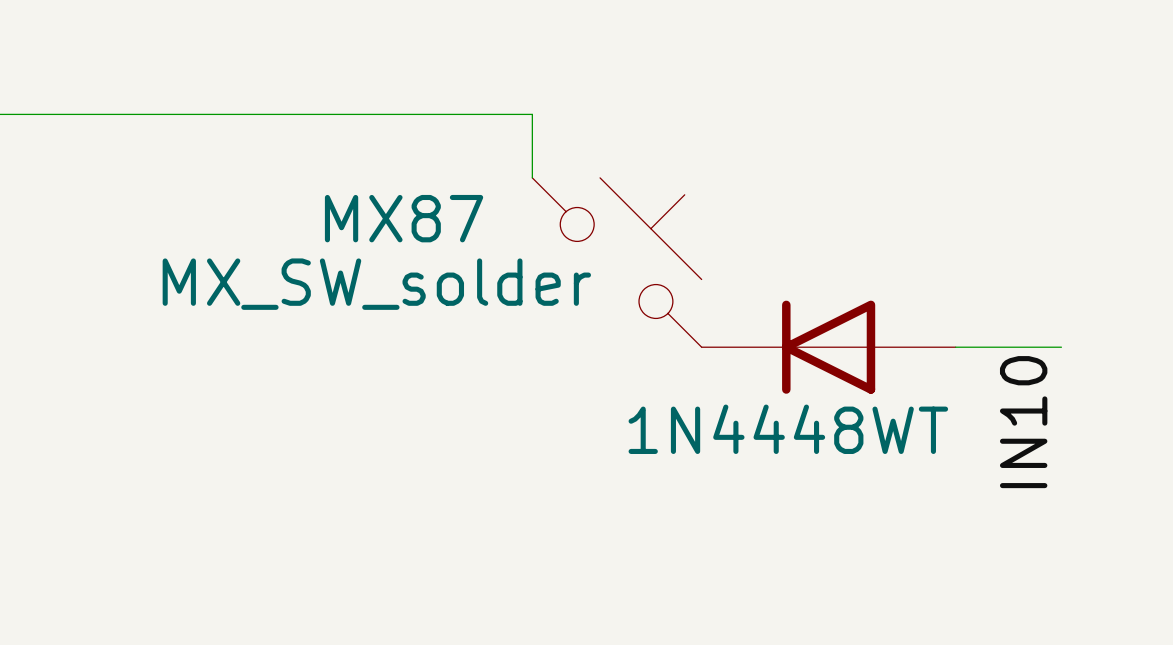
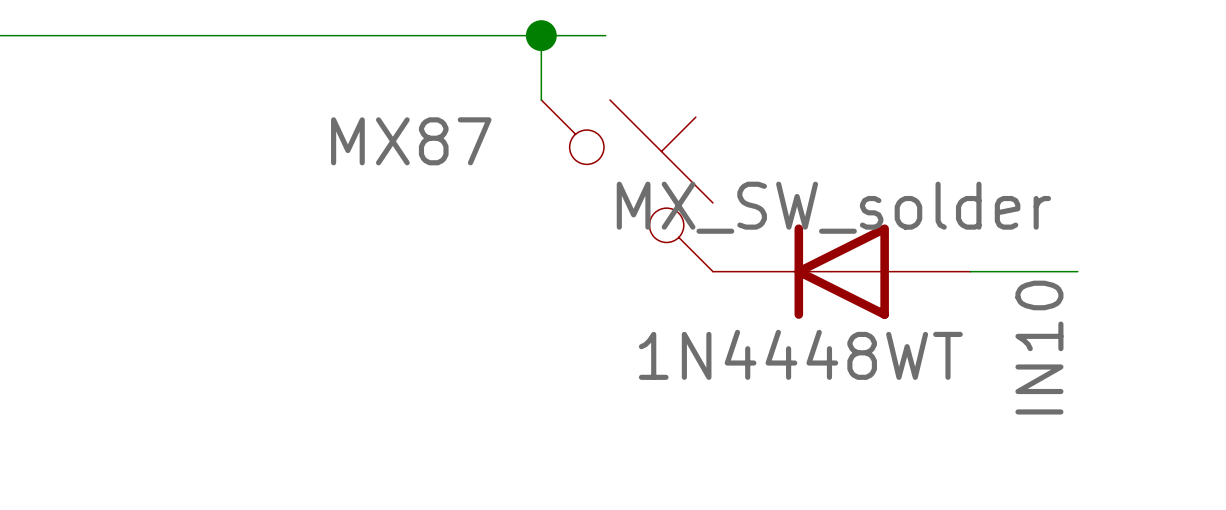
wire: none -> (541, 35) (605, 35)
junction: none -> (541, 35)
MX87 value position: MX_SW_solder (376, 284) -> MX_SW_solder (833, 207)

